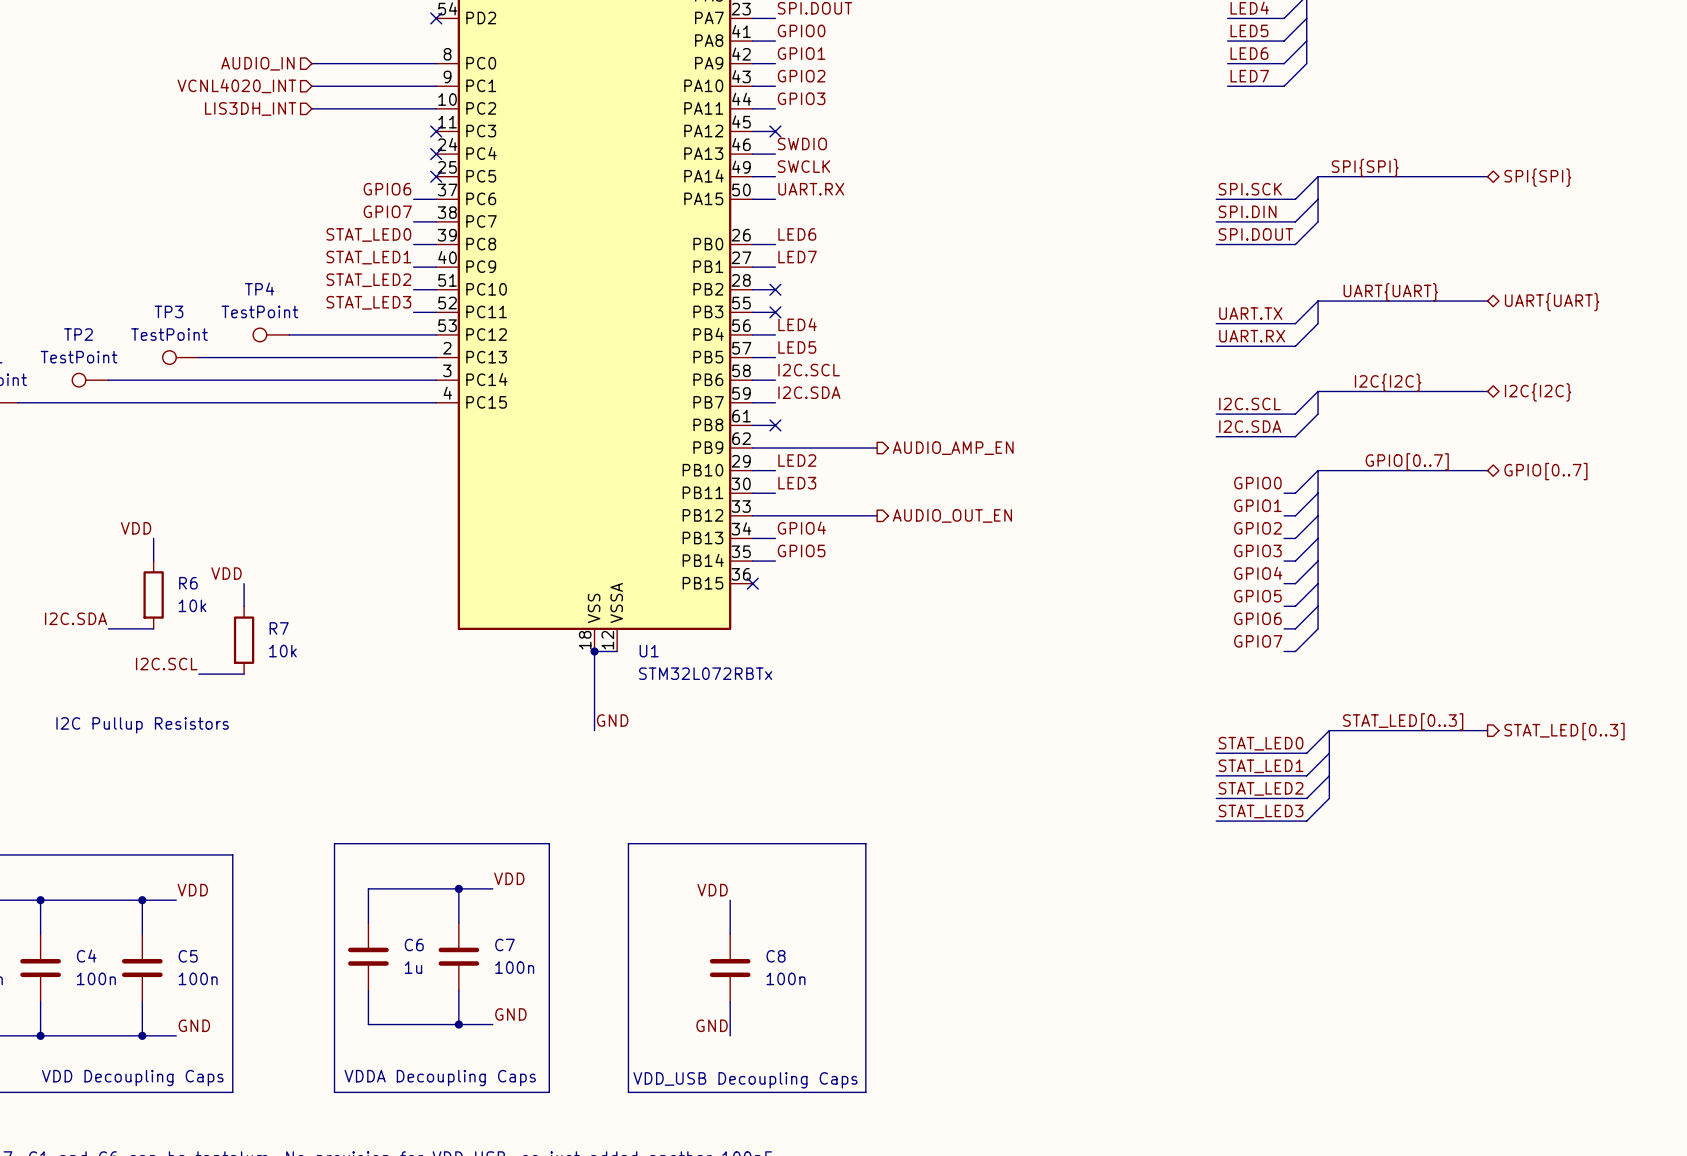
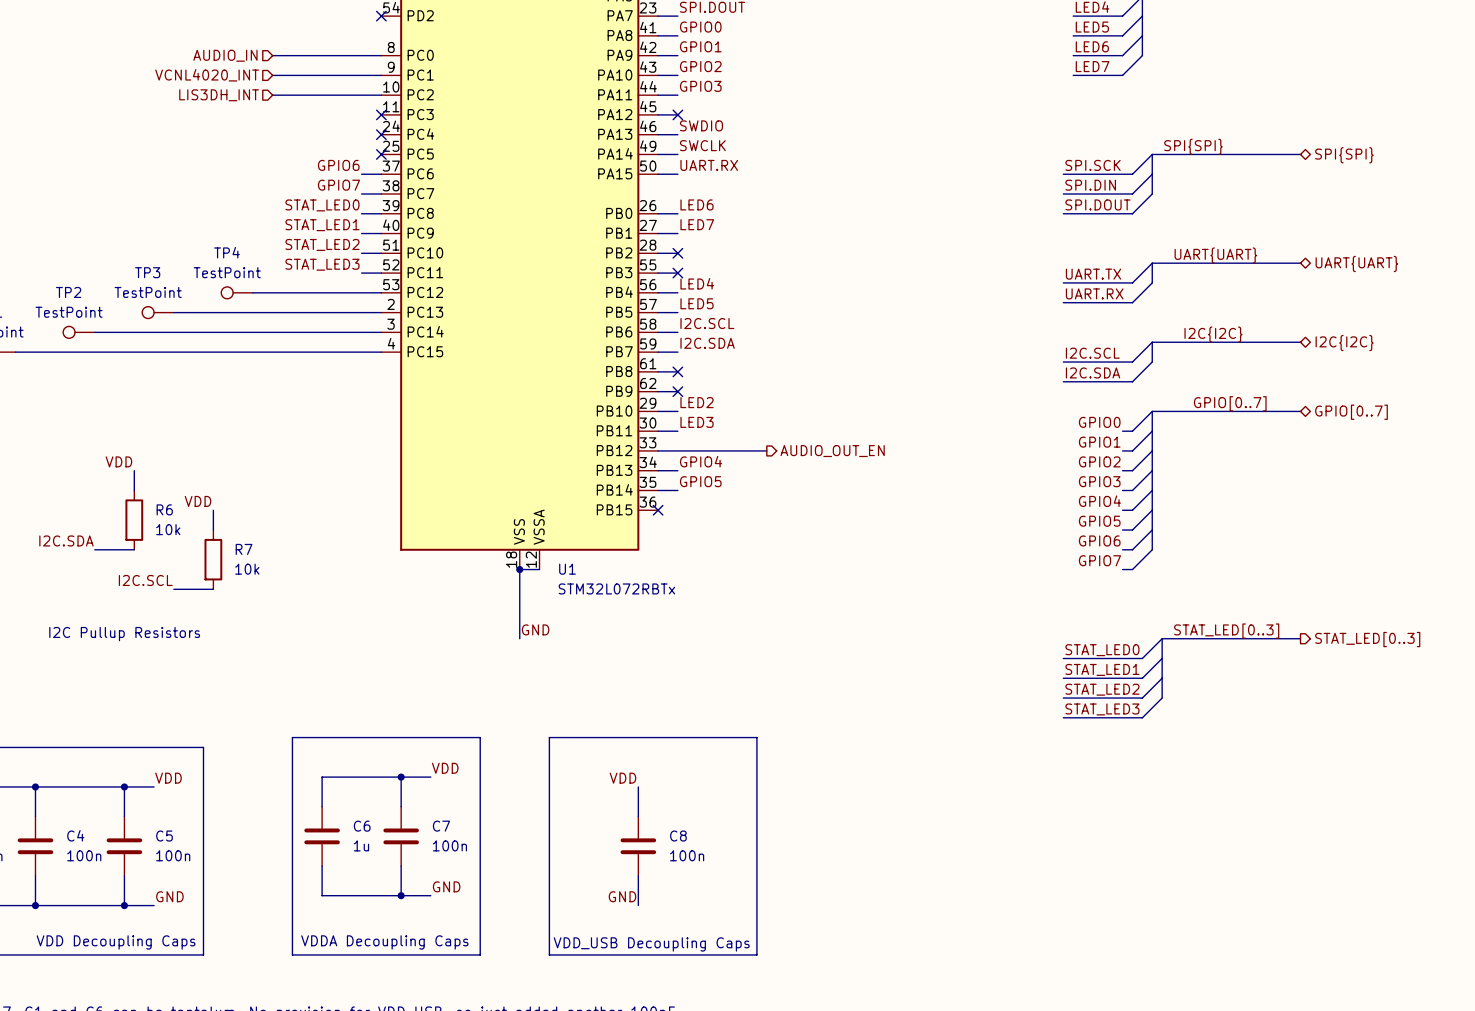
wire: (775, 448) (877, 448) -> none
no-connect mark: none -> (677, 391)
hierarchical label: AUDIO_AMP_EN (953, 448) -> none

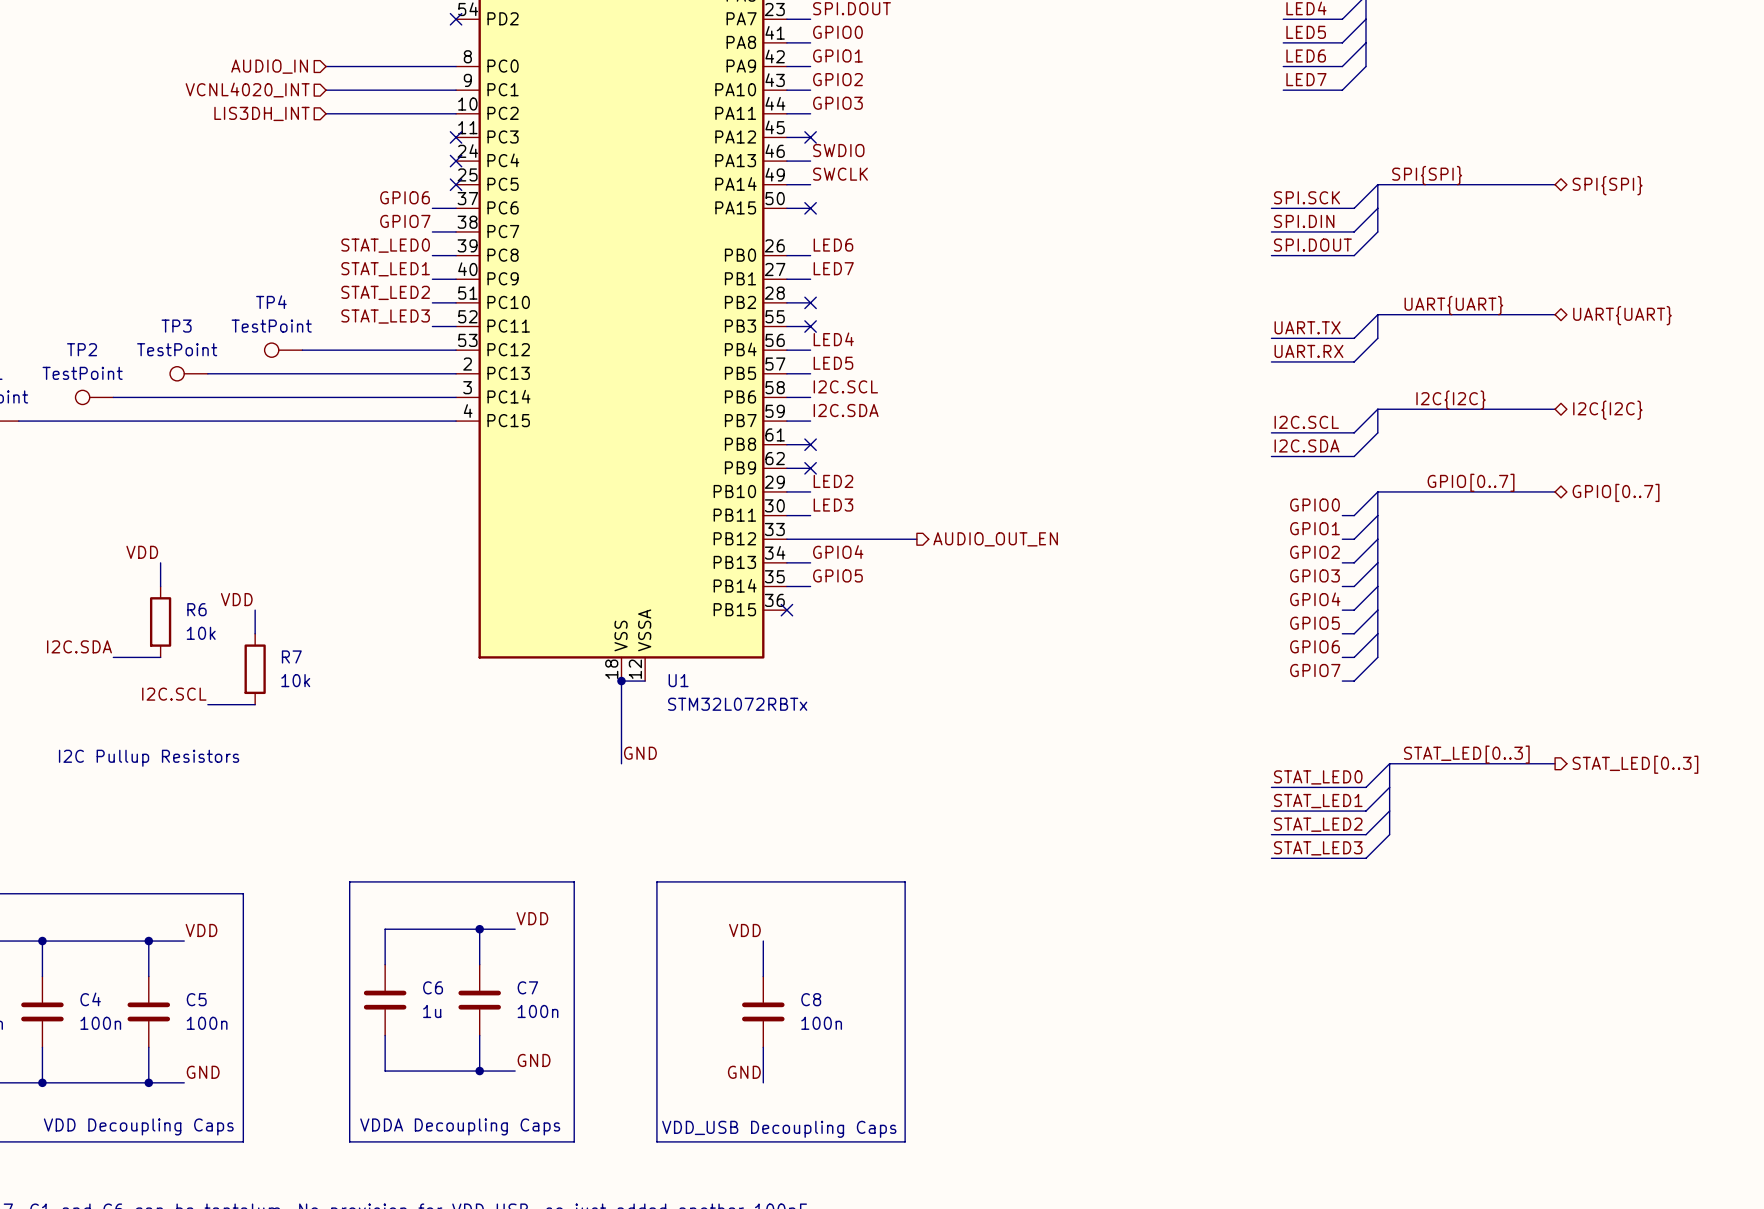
label: UART.RX (709, 165) -> none
no-connect mark: none -> (810, 208)

